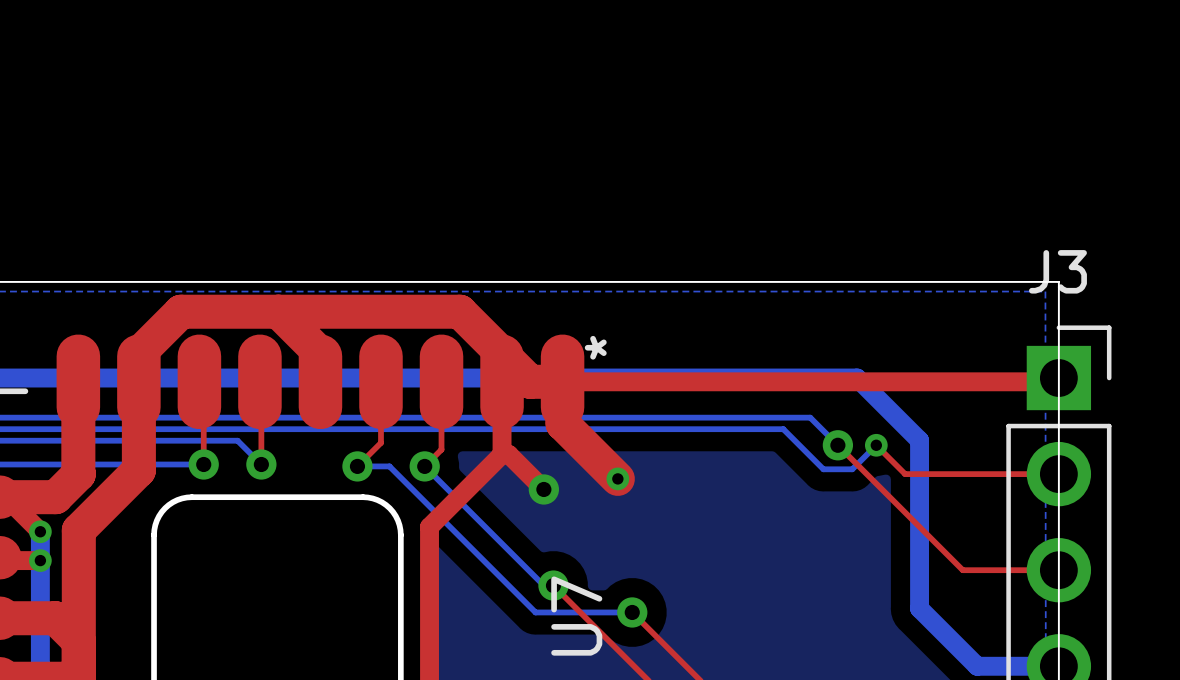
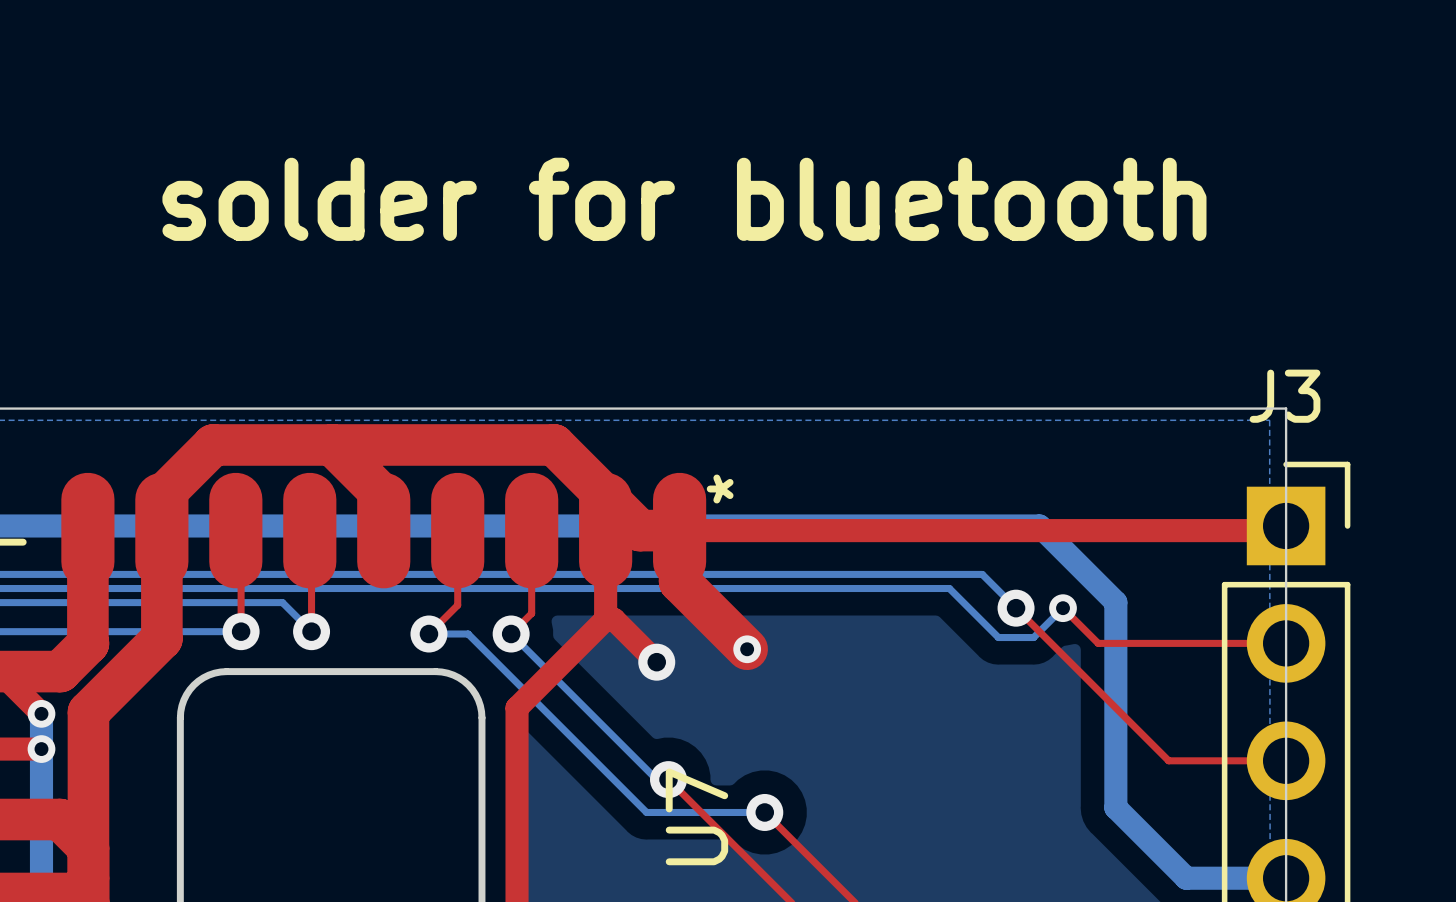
text: none -> solder for bluetooth (684, 199)

